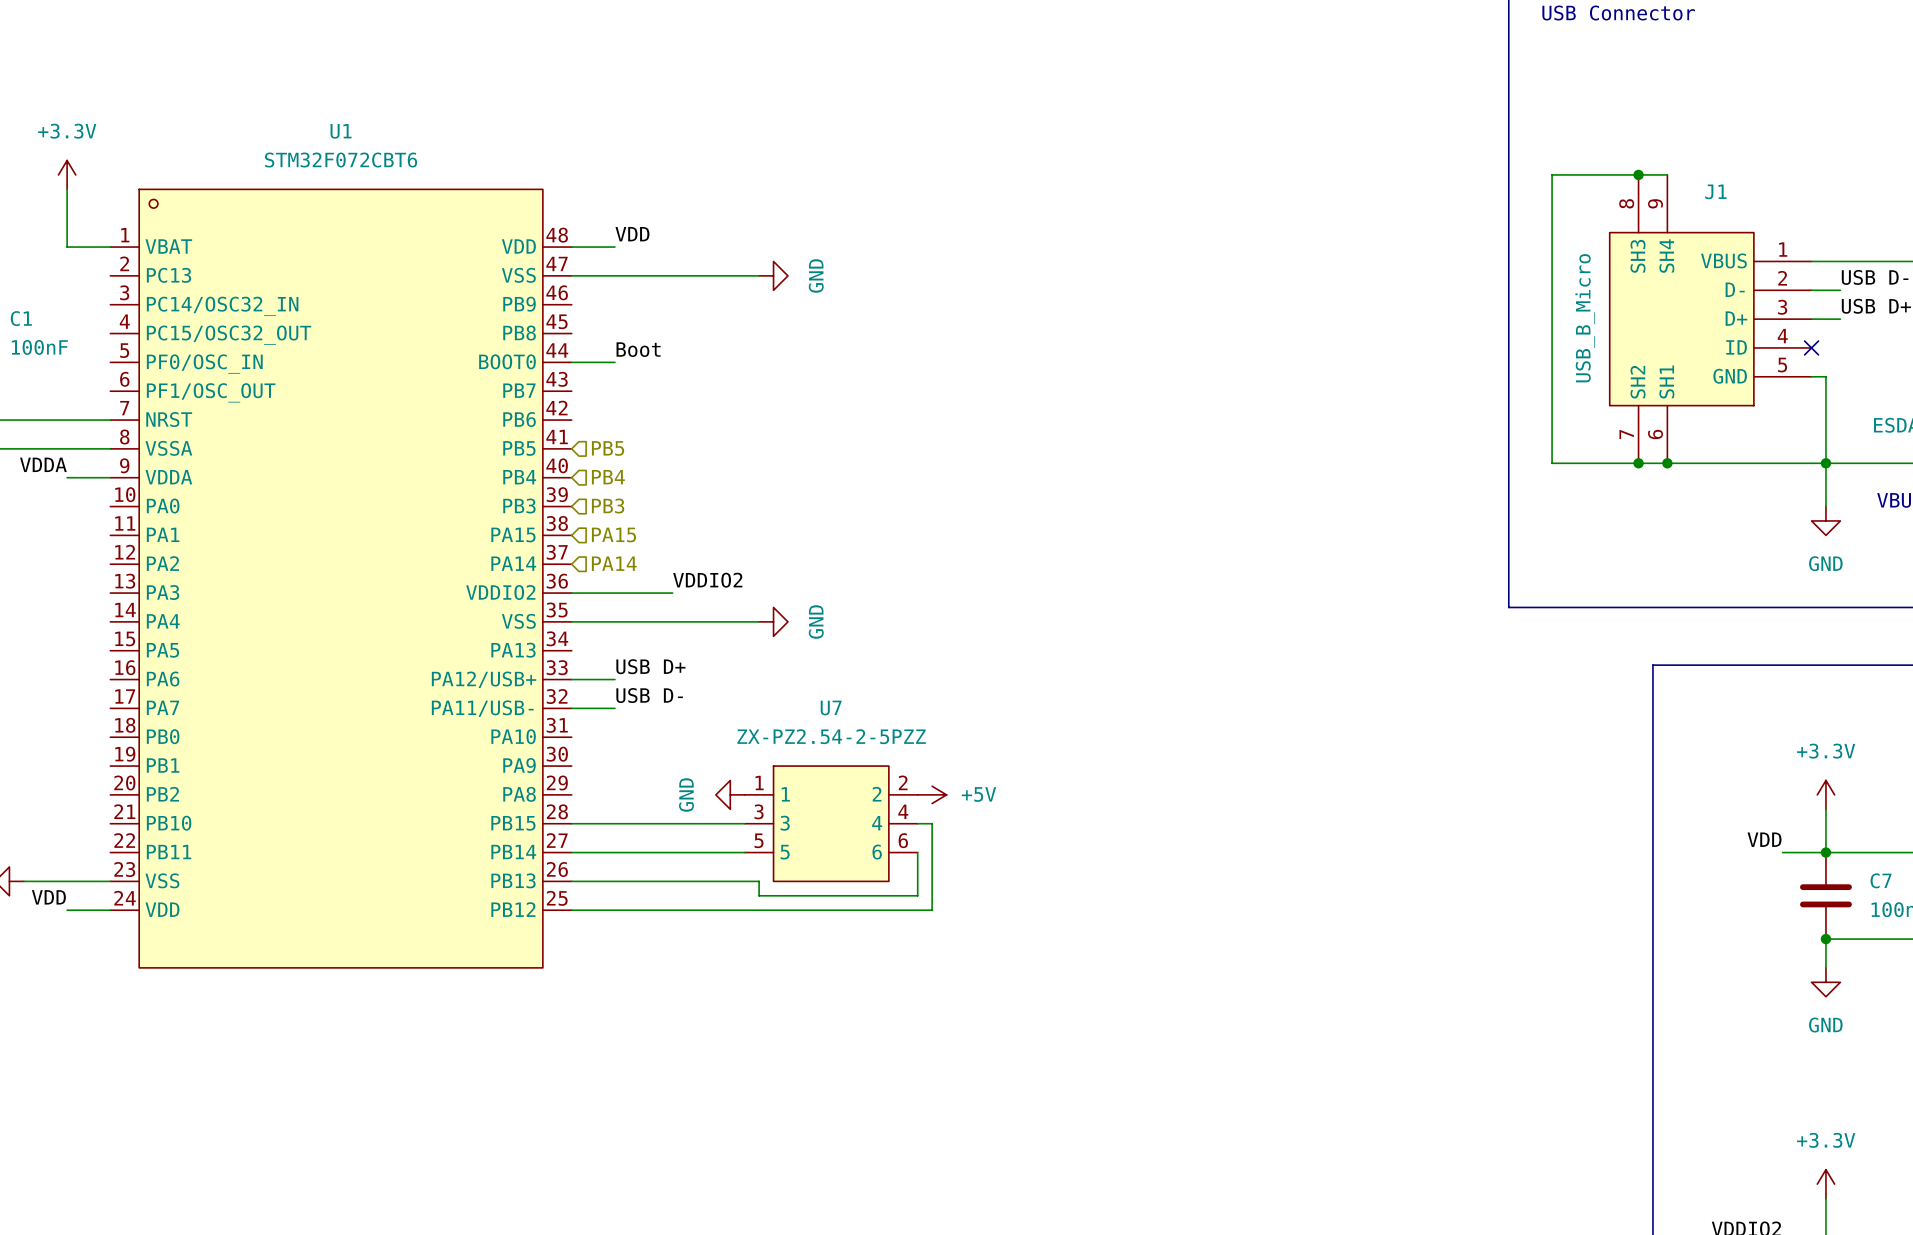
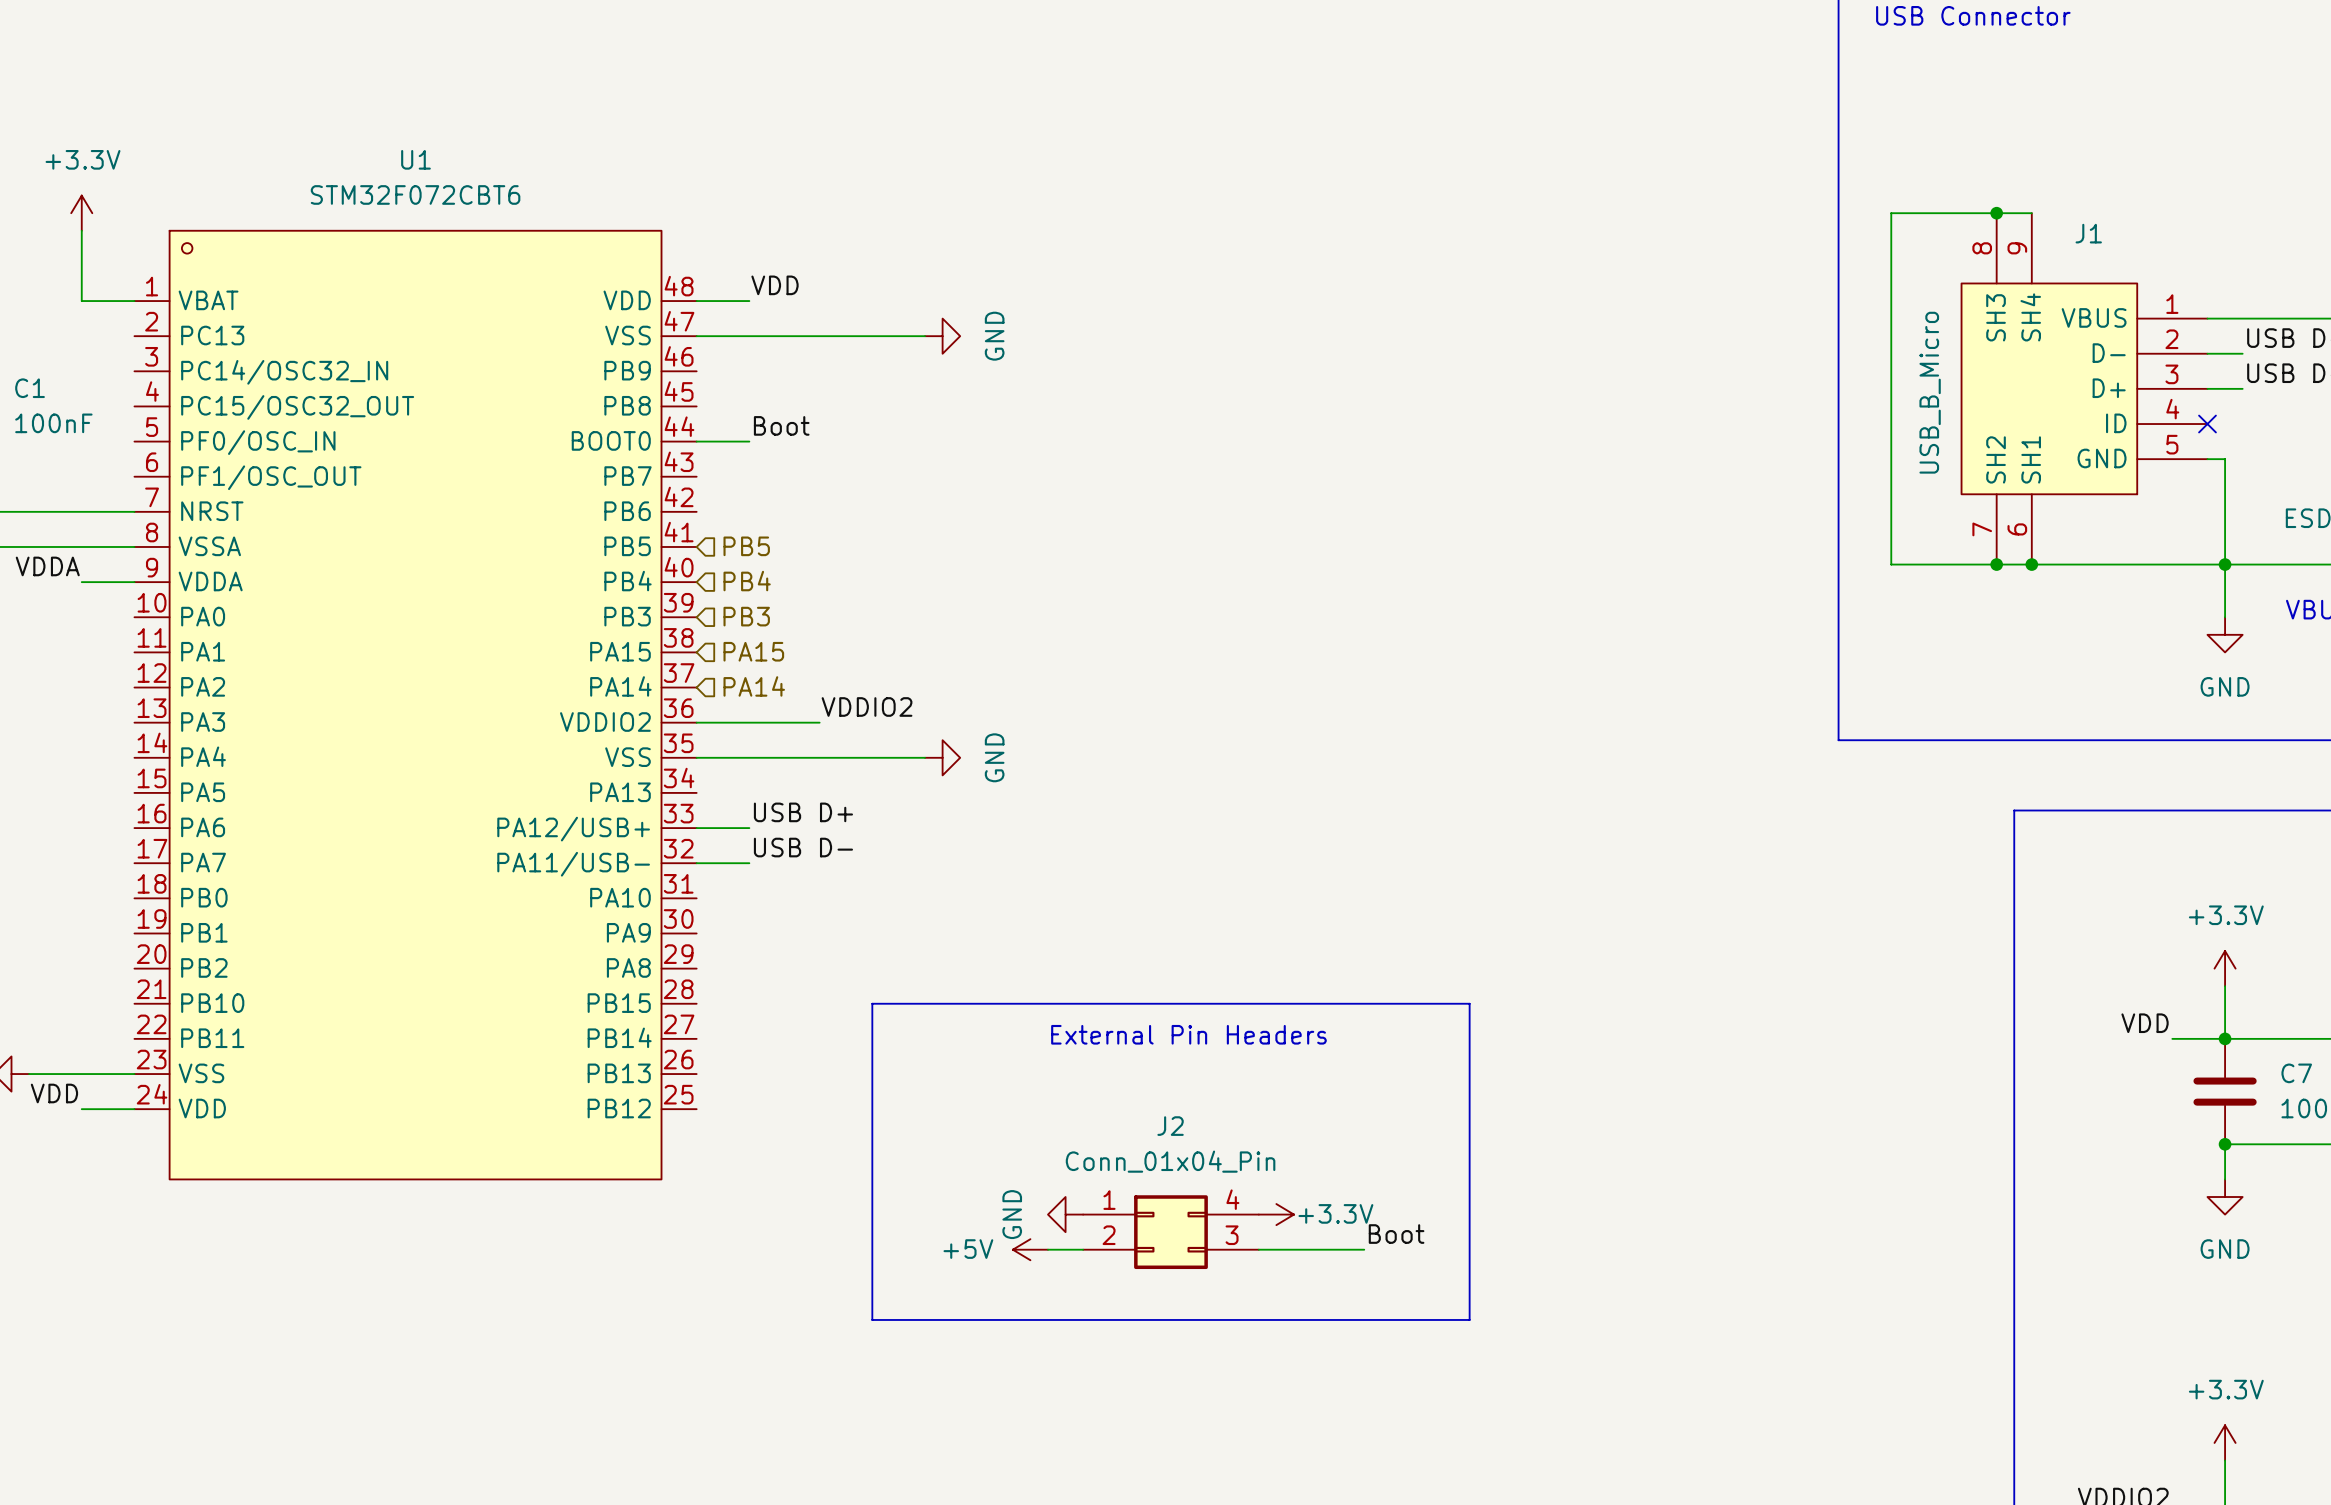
power symbol position: GND (730, 794) -> GND (1065, 1214)
power symbol rotation: 0° (932, 794) -> 180° (1030, 1249)
power symbol position: +5V (932, 794) -> +5V (1030, 1249)
wire: (571, 823) (744, 823) -> none
line: none -> (872, 1003) (1469, 1003) (1469, 1319) (872, 1319) (872, 1003)
U7: ZX-PZ2.54-2-5PZZ (831, 823) -> none
wire: (917, 823) (932, 823) (932, 910) (571, 910) -> none
text: none -> External Pin Headers (1188, 1034)
wire: (571, 852) (744, 852) -> none
wire: (917, 852) (917, 895) (759, 895) (759, 881) (571, 881) -> none
power symbol: none -> +3.3V (1276, 1214)
J2: none -> Conn_01x04_Pin (1170, 1232)
label: none -> Boot (1396, 1234)
wire: none -> (1048, 1249) (1083, 1249)
wire: none -> (1258, 1249) (1364, 1249)

